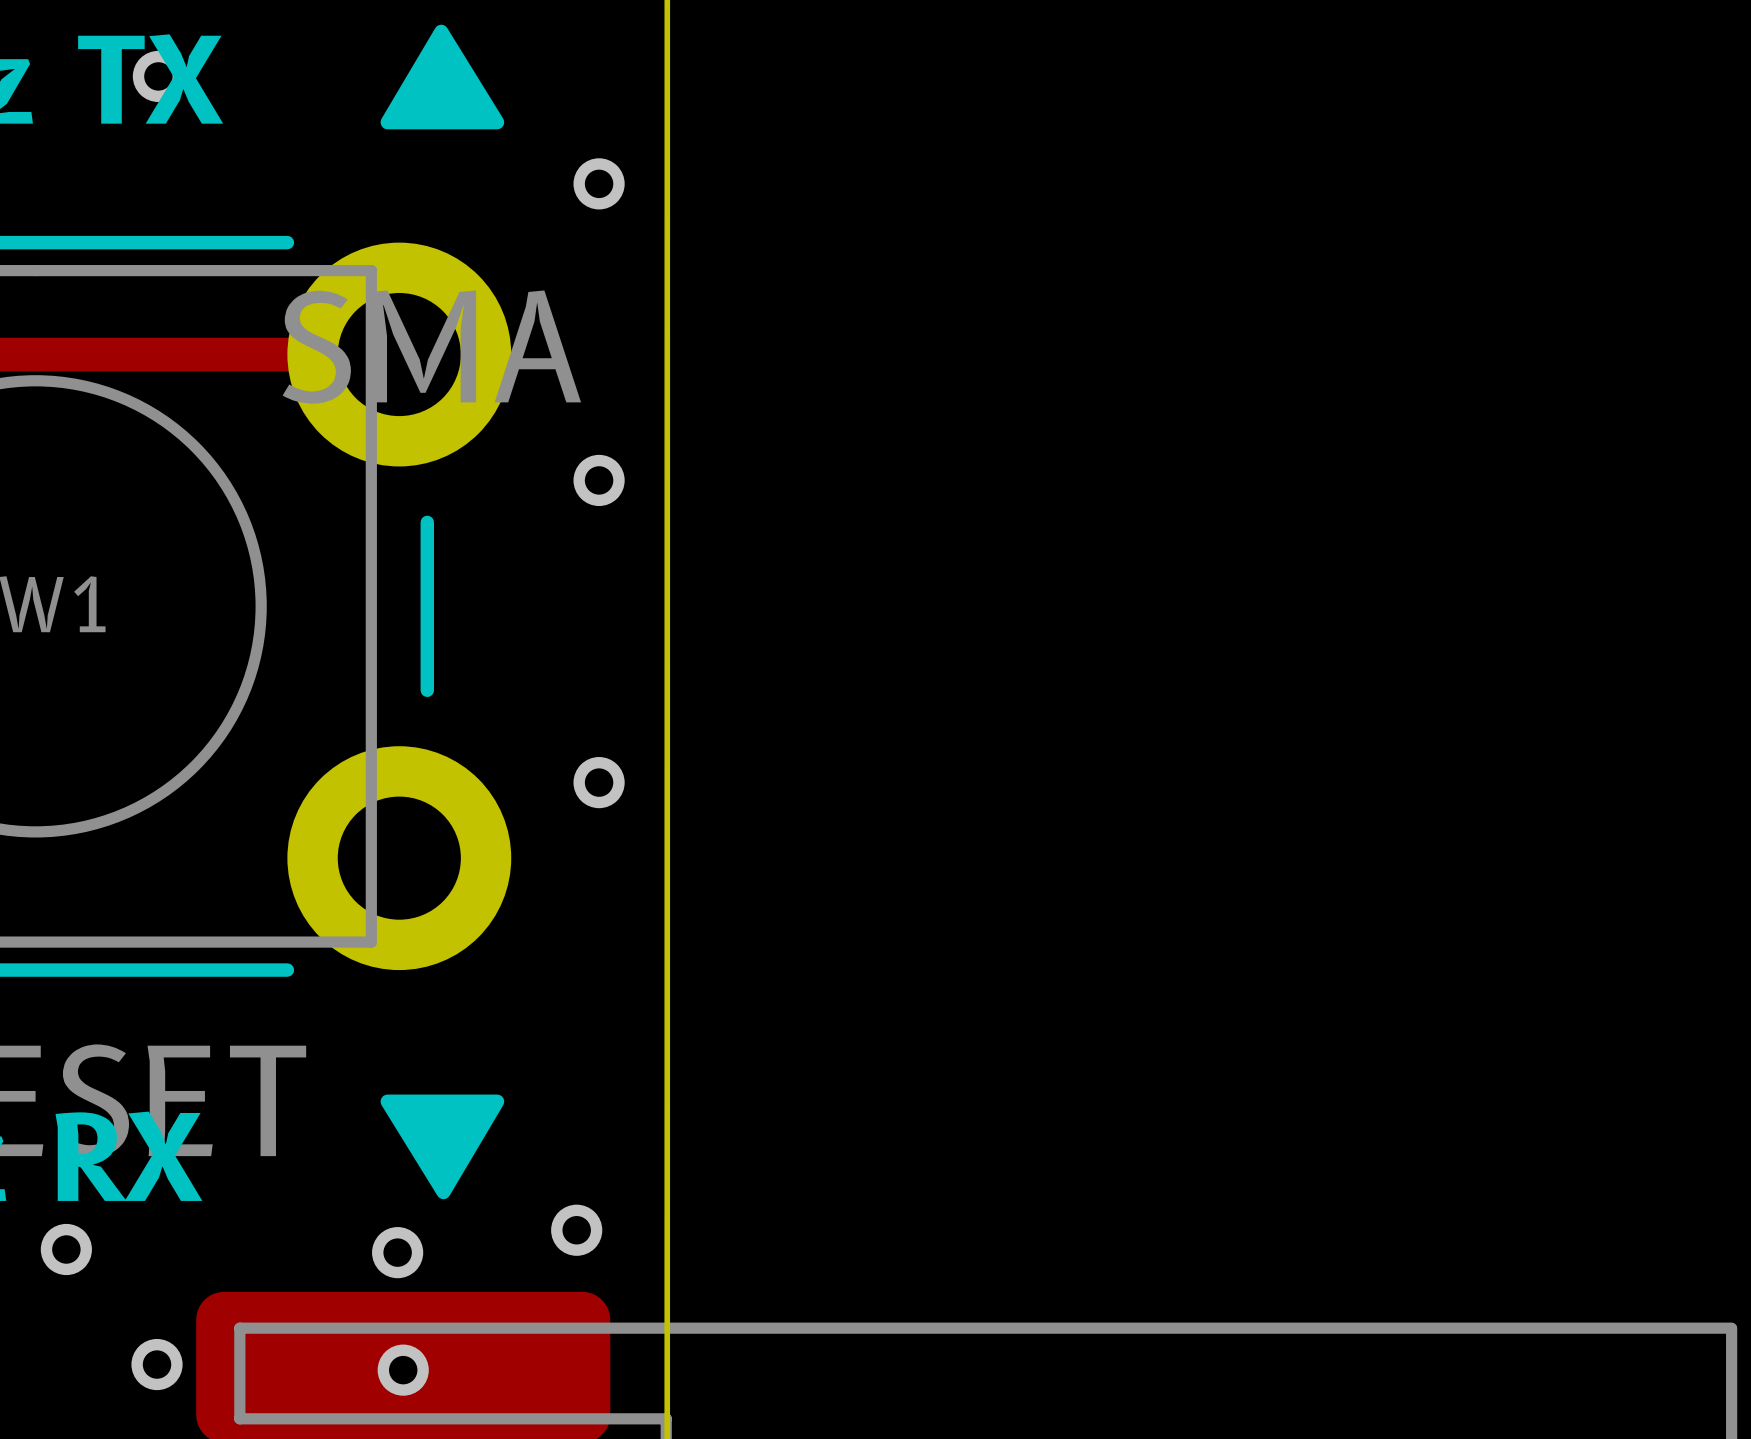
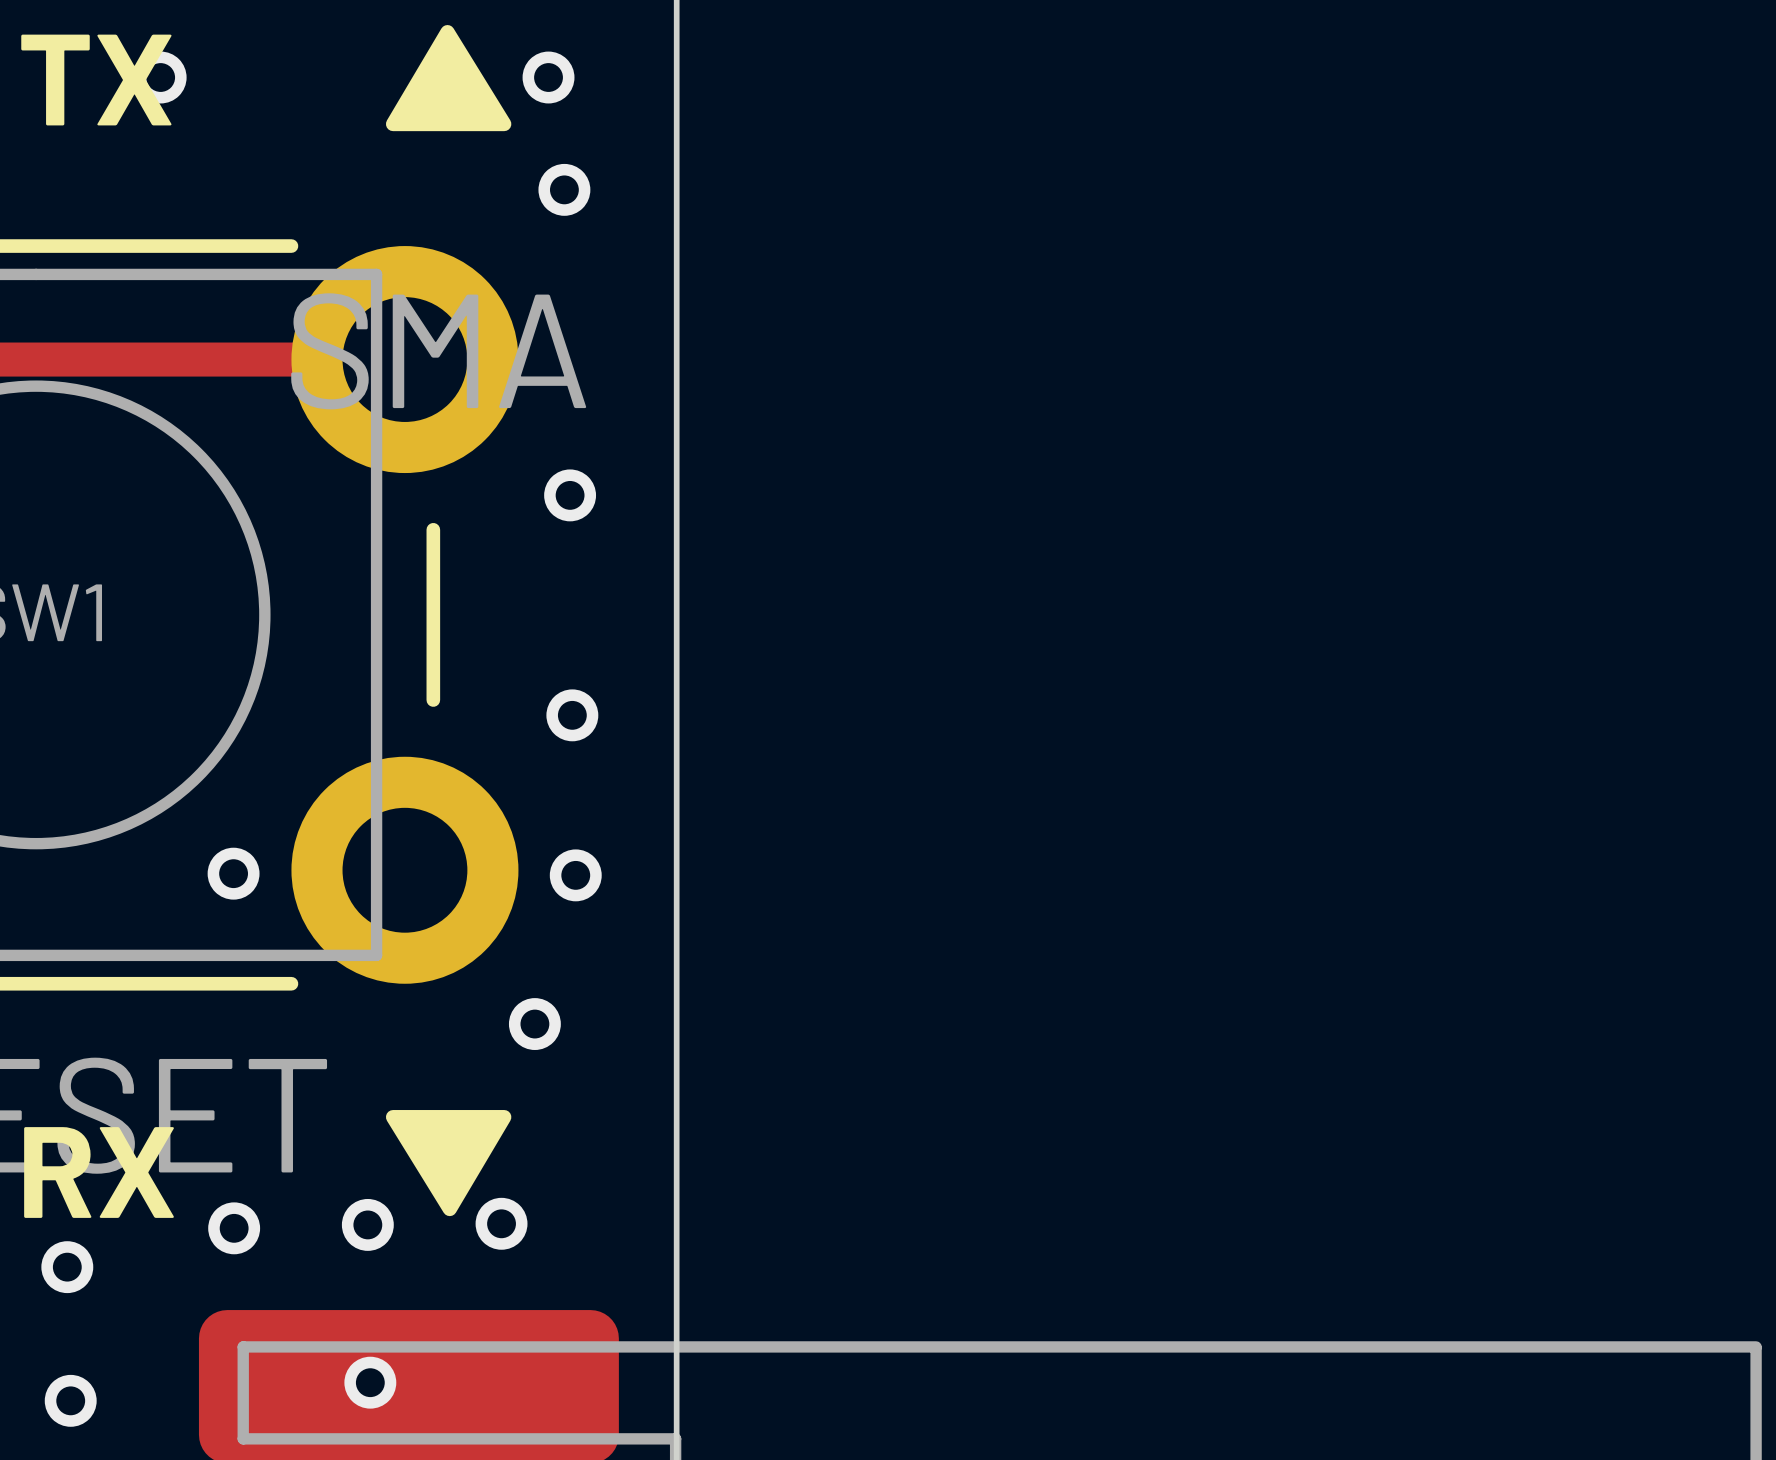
via: none -> (548, 77)
via position: (599, 183) -> (564, 189)
via position: (599, 480) -> (570, 495)
via: none -> (572, 715)
via: (599, 782) -> none
via: none -> (233, 873)
via: none -> (575, 875)
via: none -> (534, 1024)
via: none -> (501, 1223)
via: none -> (234, 1228)
via: (576, 1230) -> none
via position: (397, 1252) -> (367, 1224)
via: (157, 1364) -> none
via position: (403, 1370) -> (370, 1382)
via: none -> (70, 1400)

